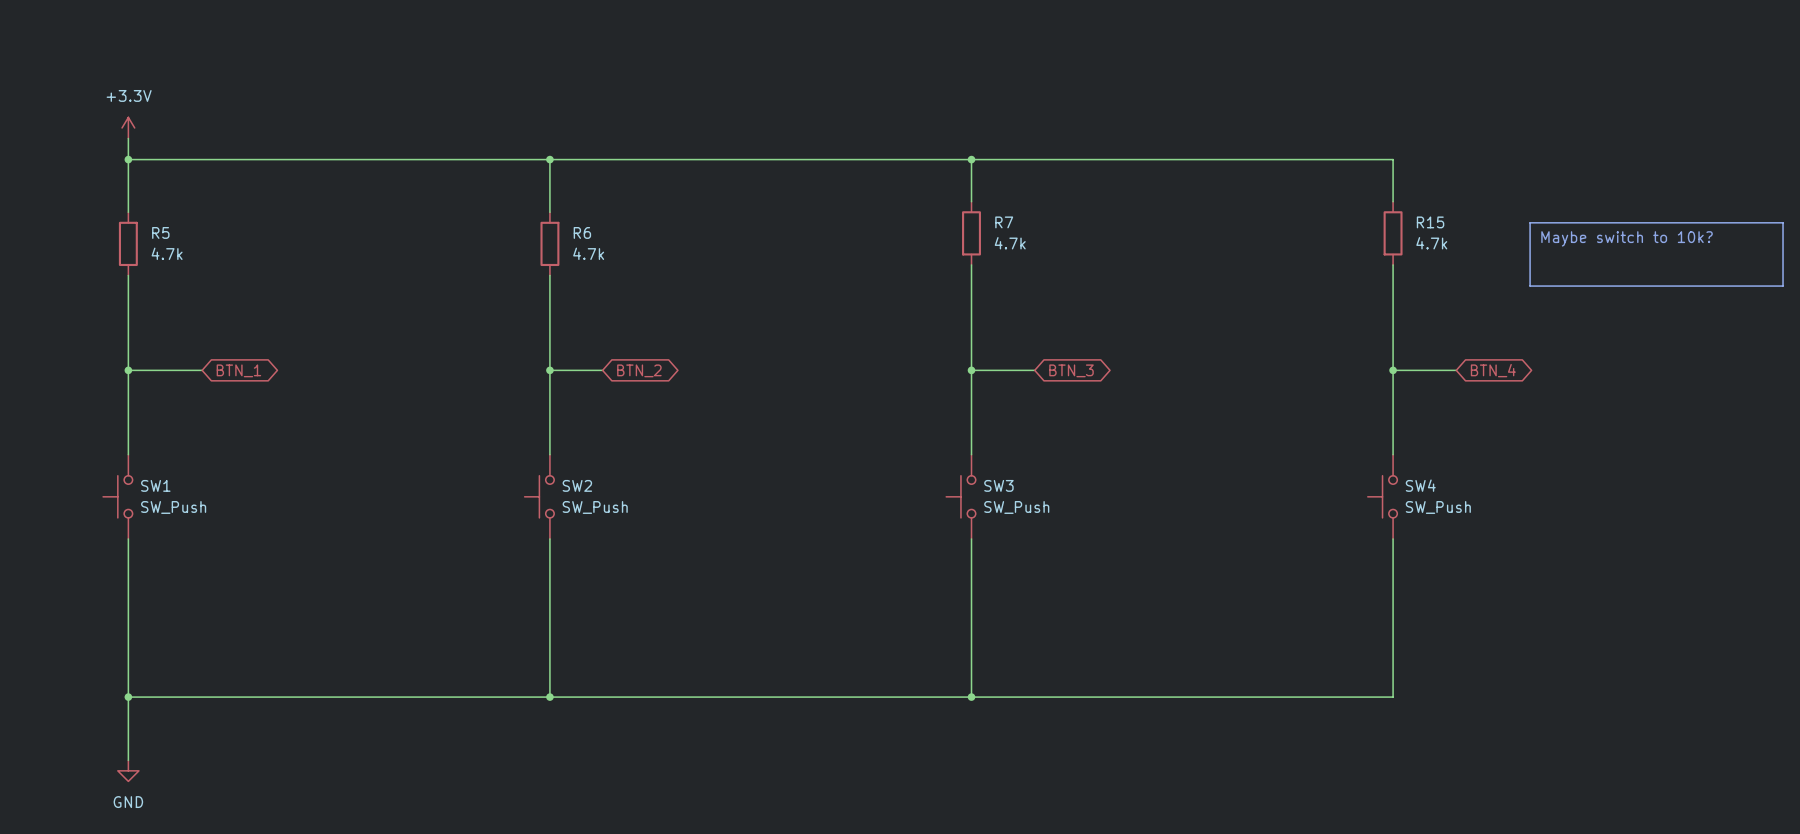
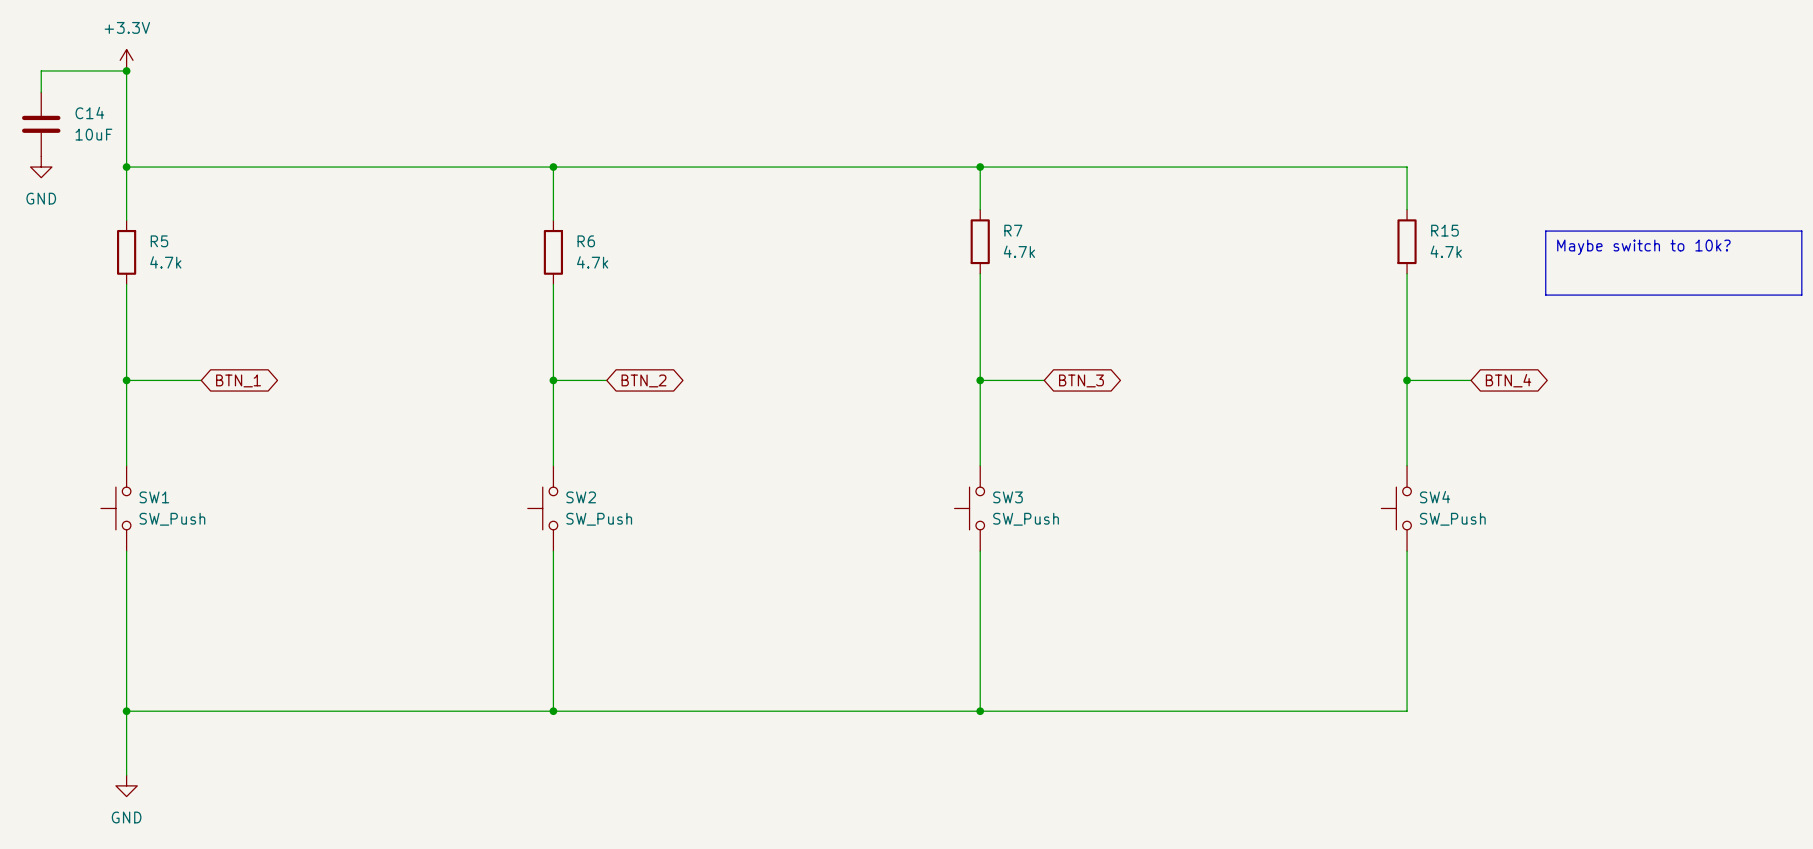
junction: none -> (126, 70)
wire: none -> (41, 92) (41, 70) (126, 70) (126, 145)
C14: none -> 10uF (41, 124)
power symbol position: +3.3V (128, 127) -> +3.3V (126, 60)
power symbol: none -> GND (41, 167)

